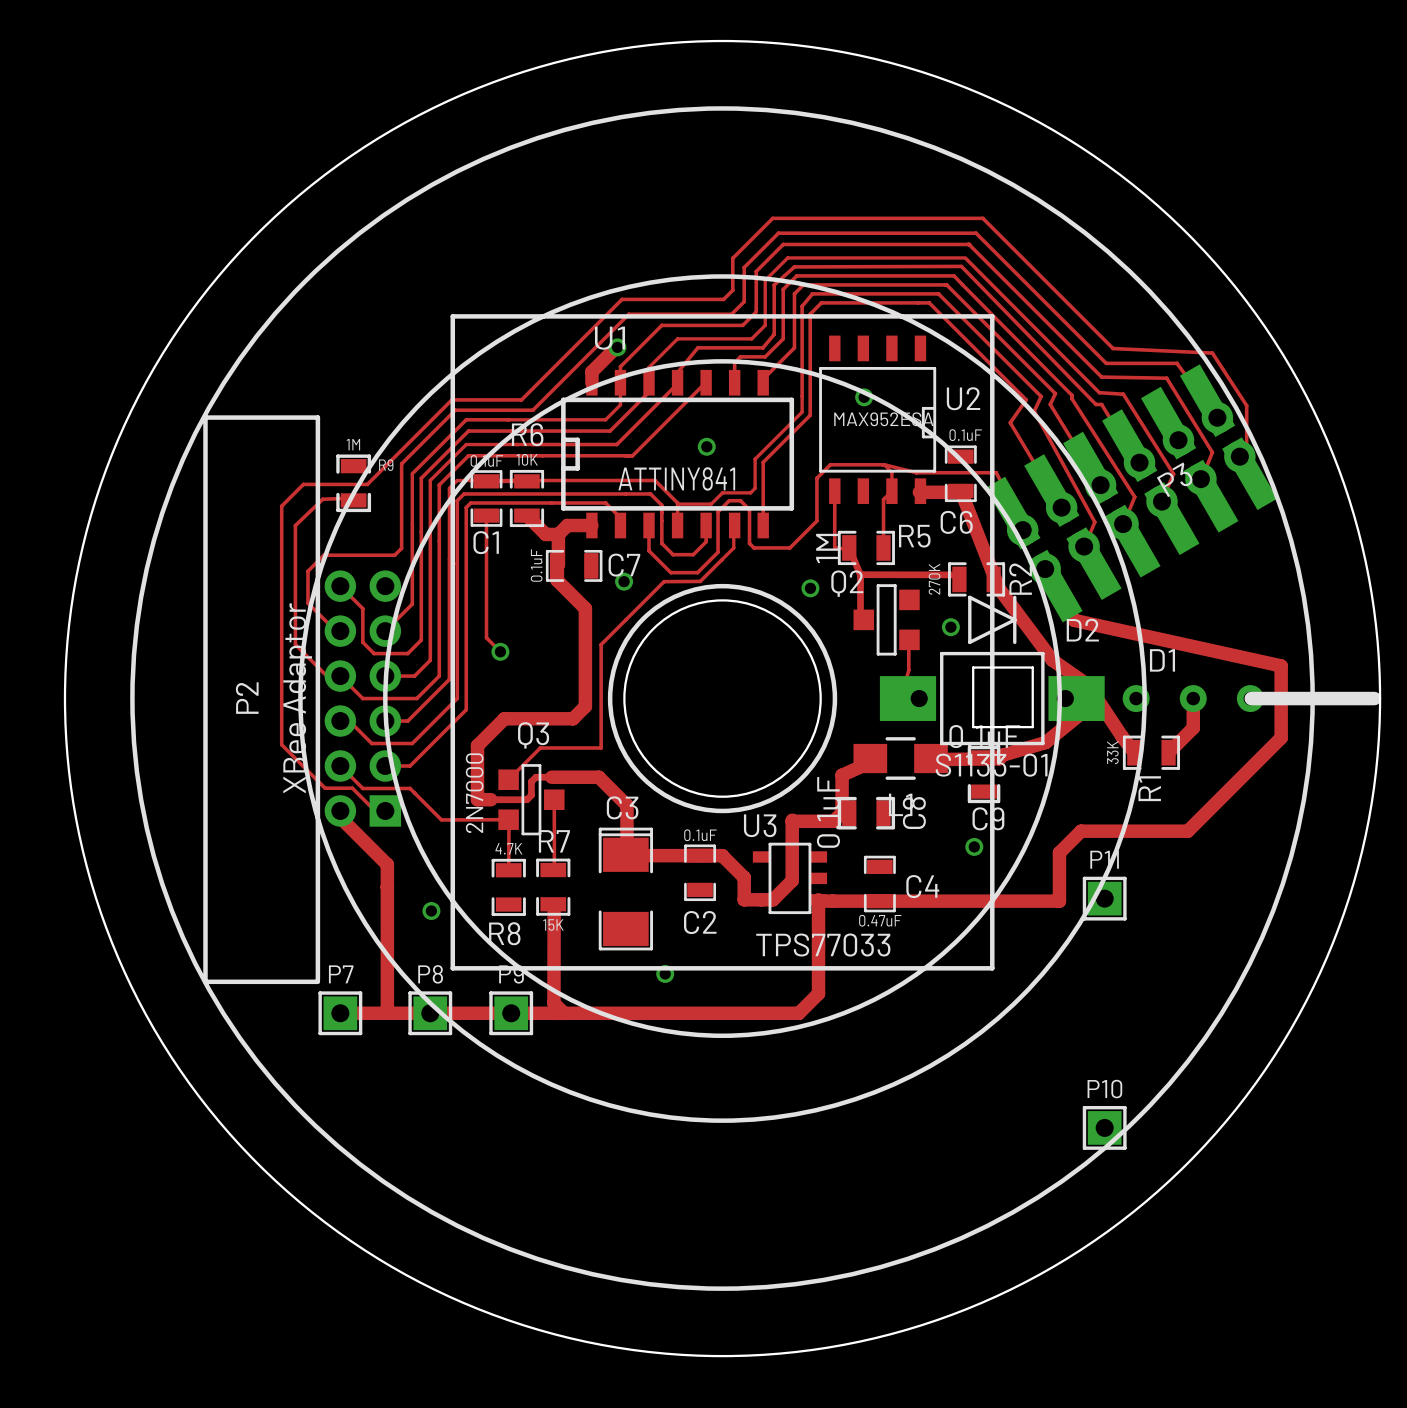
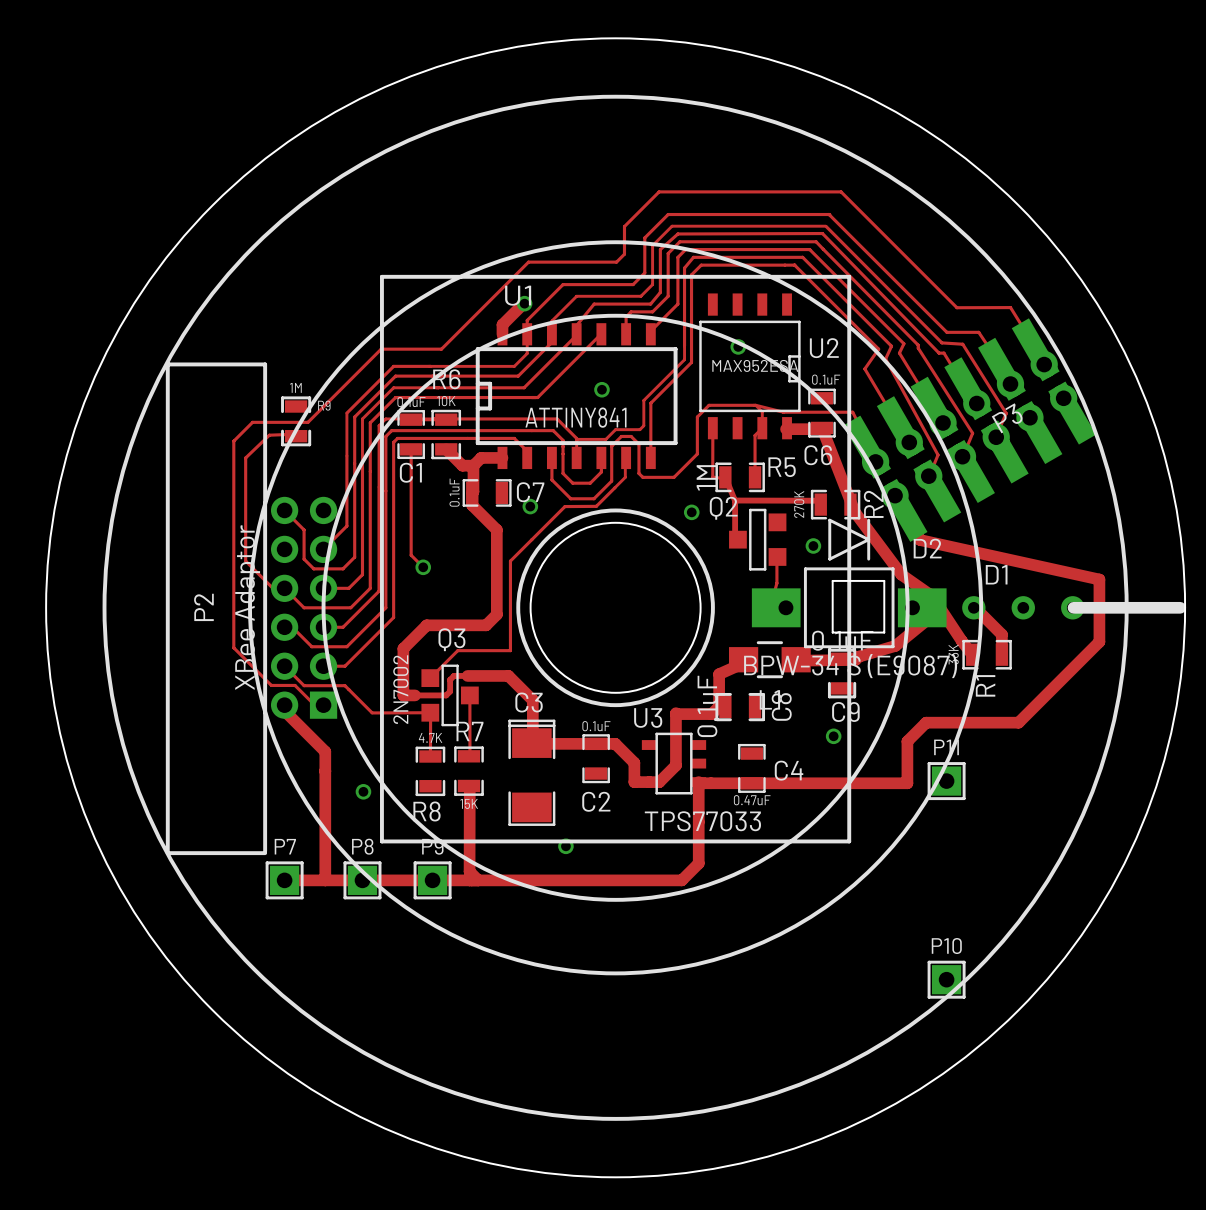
track: (1113, 348) (1212, 353) (1246, 405) (1246, 451) (1239, 457) -> (953, 304) (956, 307) (1010, 307) (1029, 337)
track: (1101, 377) (1166, 378) (1212, 452) (1200, 480) -> (943, 329) (946, 332) (978, 332) (1011, 380)
track: (1217, 419) (1177, 363) (1106, 363) (976, 233) (778, 233) (744, 267) (744, 301) (731, 314) (628, 314) (532, 410) (455, 410) (401, 463) (401, 548) (394, 555) (323, 555) (307, 571) (307, 603) (335, 631) -> none
track: (1193, 698) (1193, 728) (1168, 752) -> (973, 607) (1001, 634) (1001, 654)
D2 value: S1133-01 (991, 765) -> BPW-34 S (E9087) (850, 666)
Q3 value: 2N7000 (474, 793) -> 2N7002 (400, 689)

